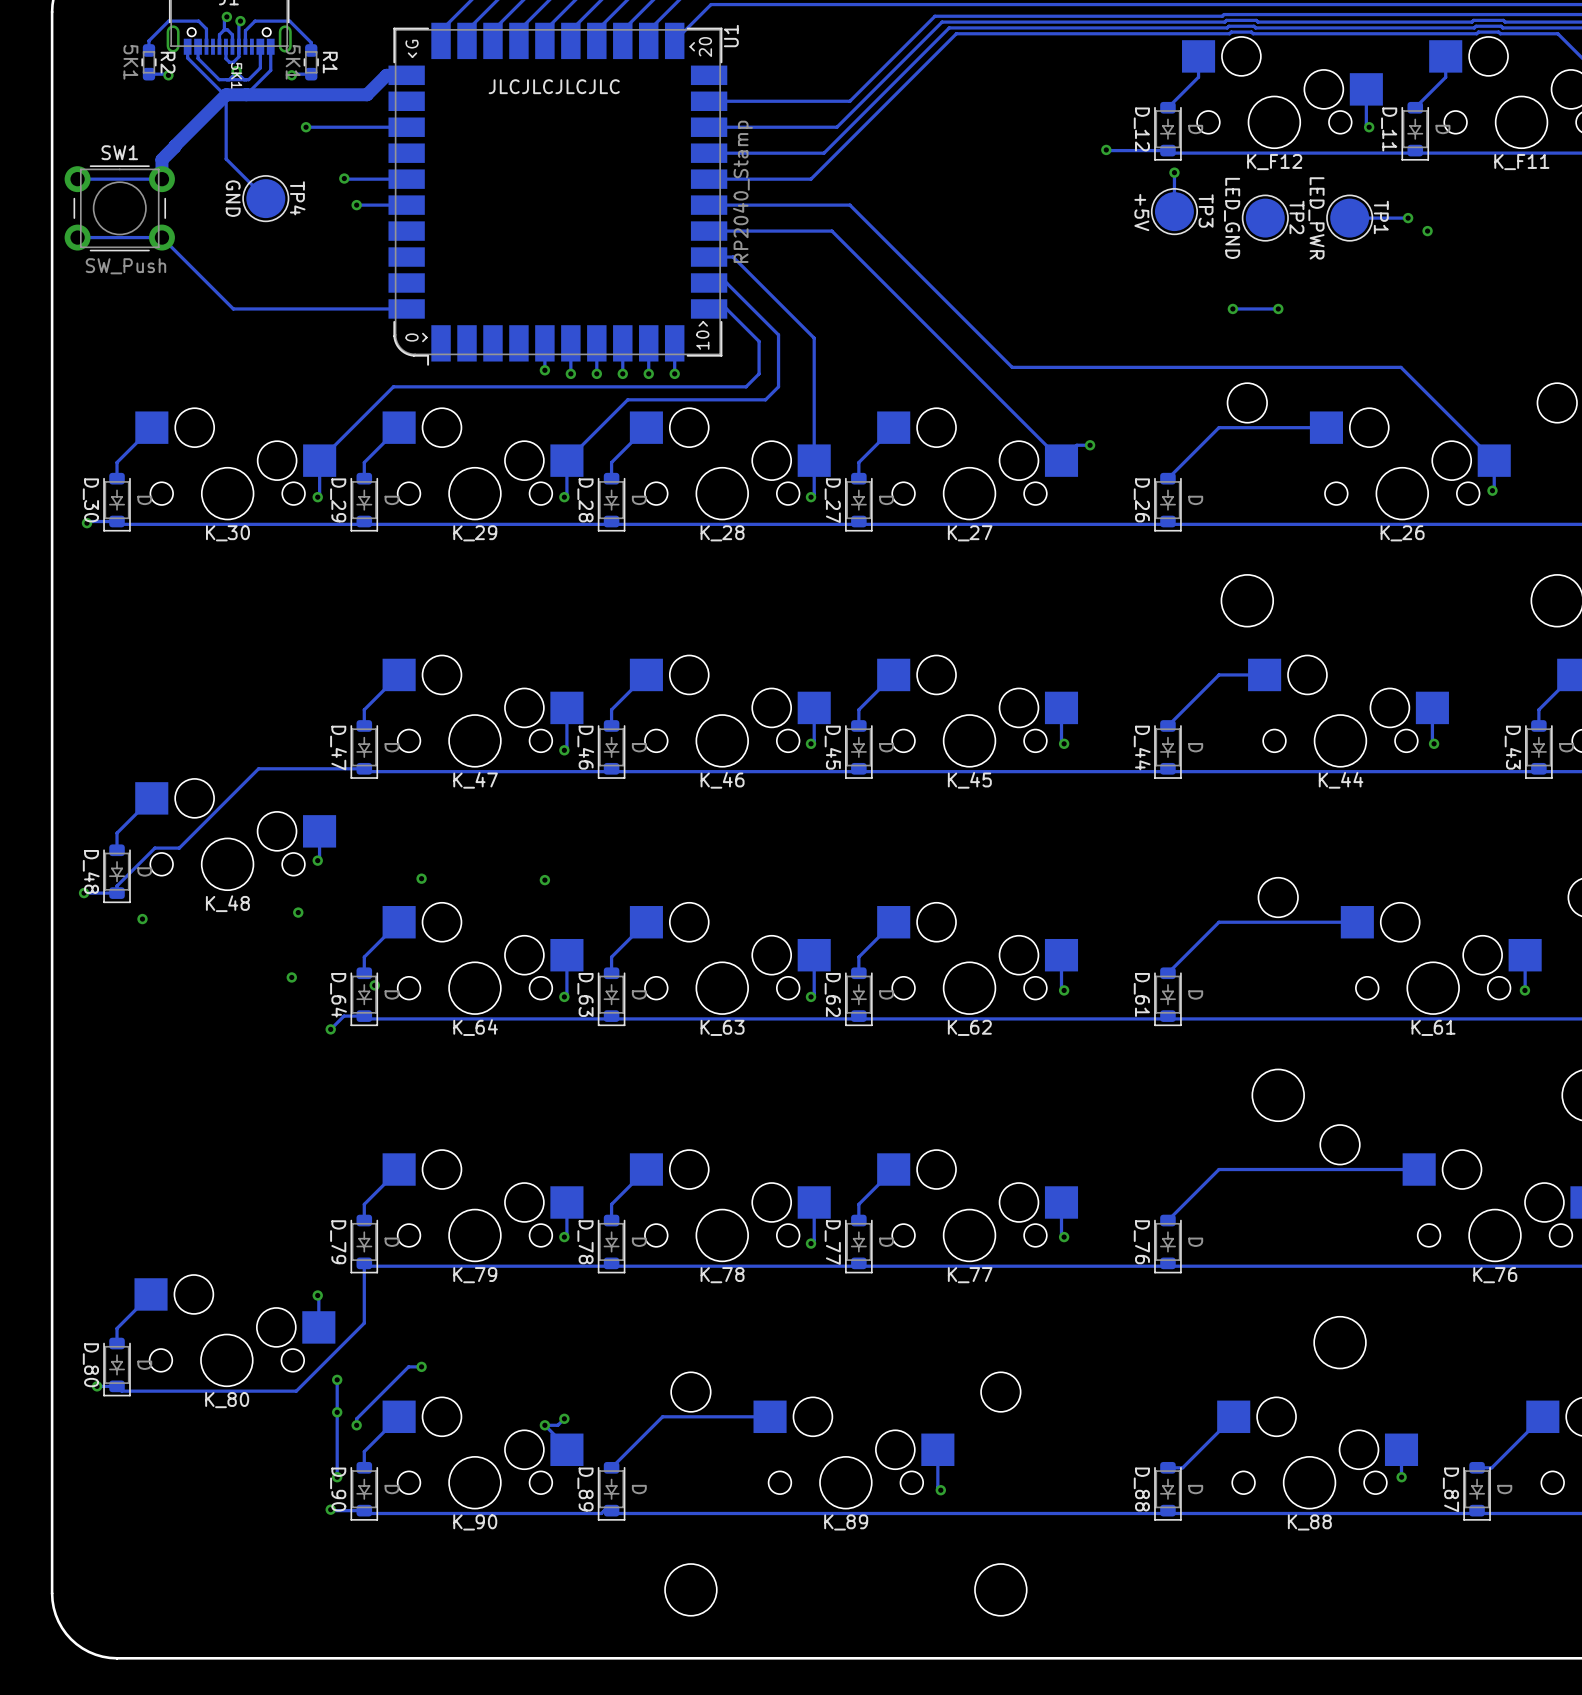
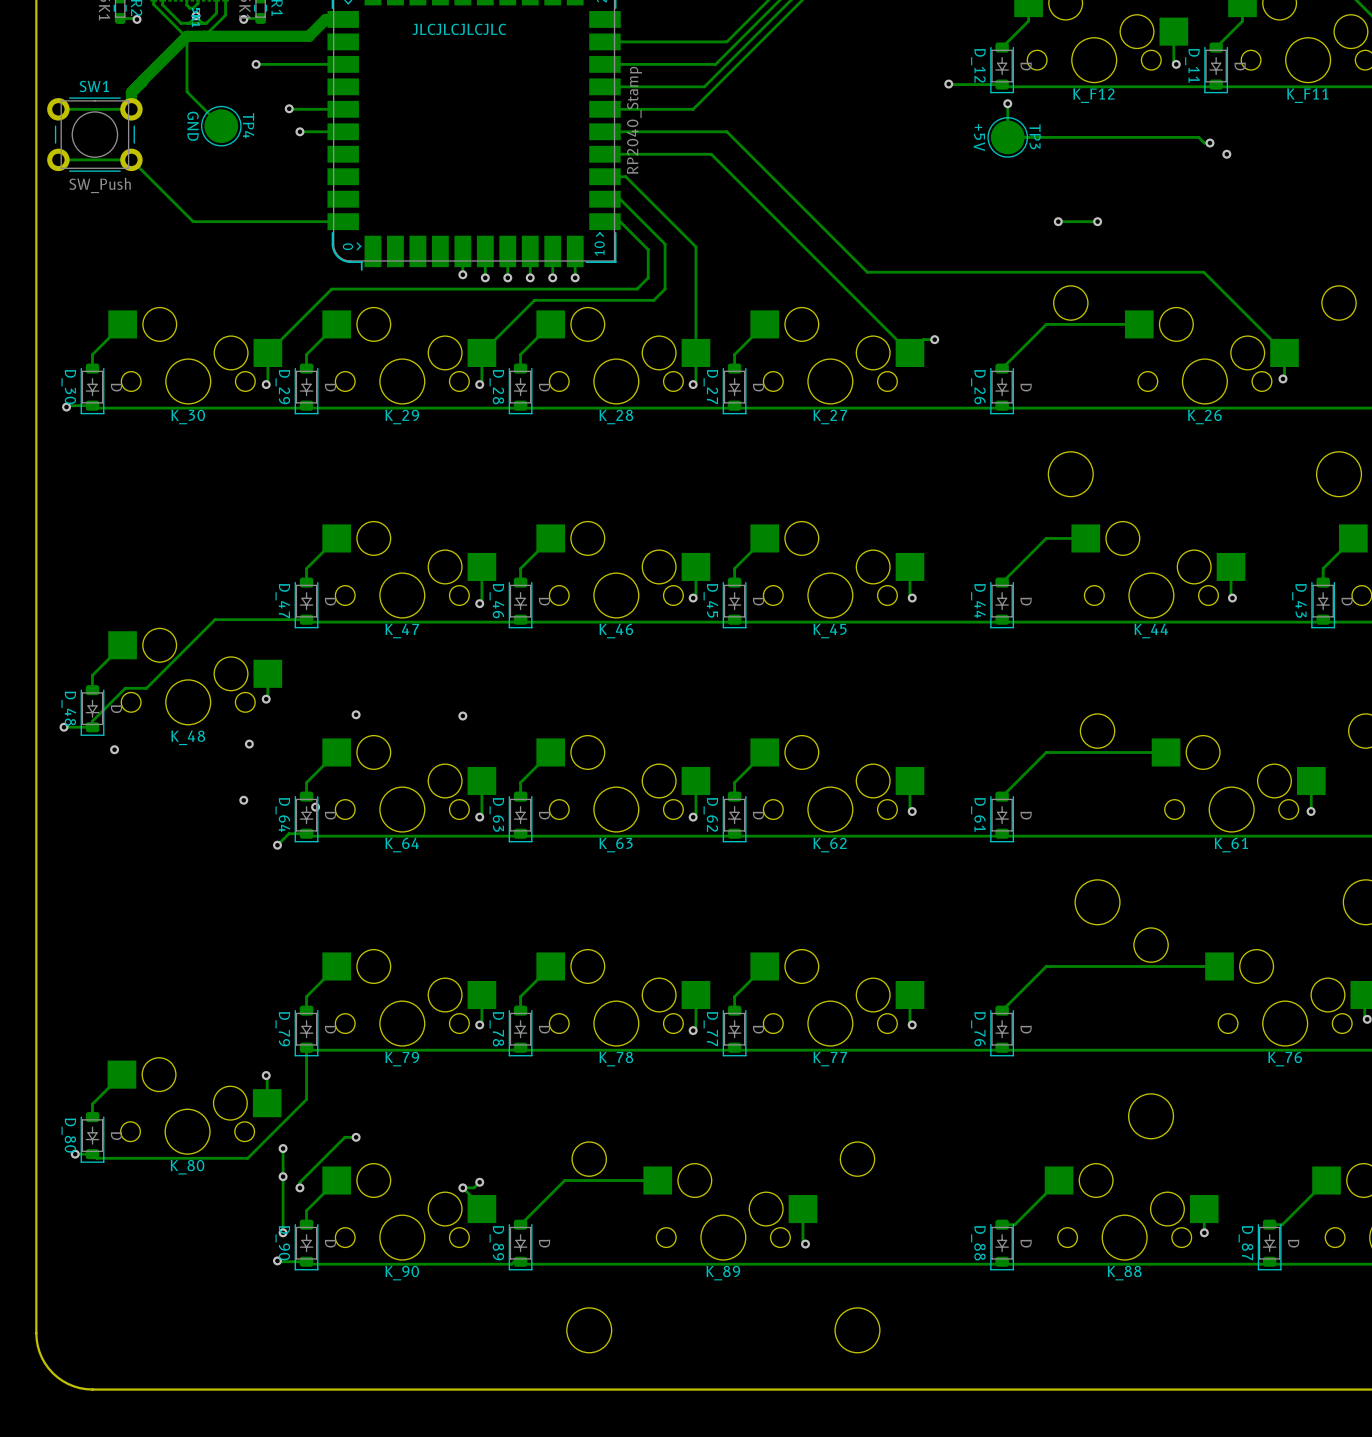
TP2: LED_GND (1265, 218) -> none
TP1: LED_PWR (1349, 218) -> none
track: (1401, 218) (1349, 218) -> (1204, 143) (1198, 137) (1007, 137)

